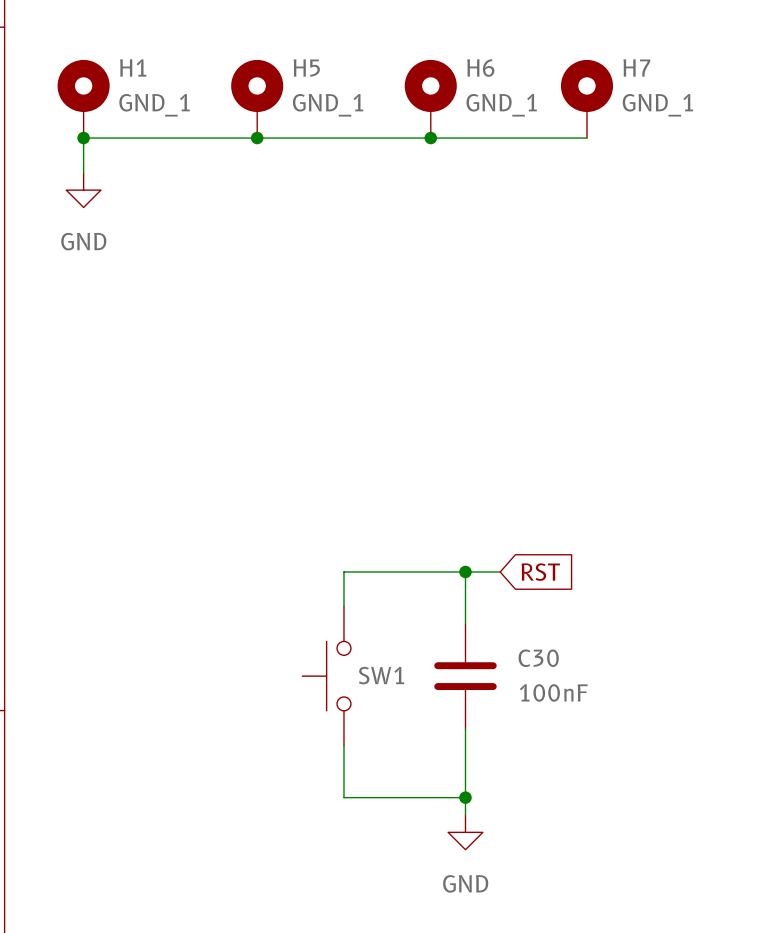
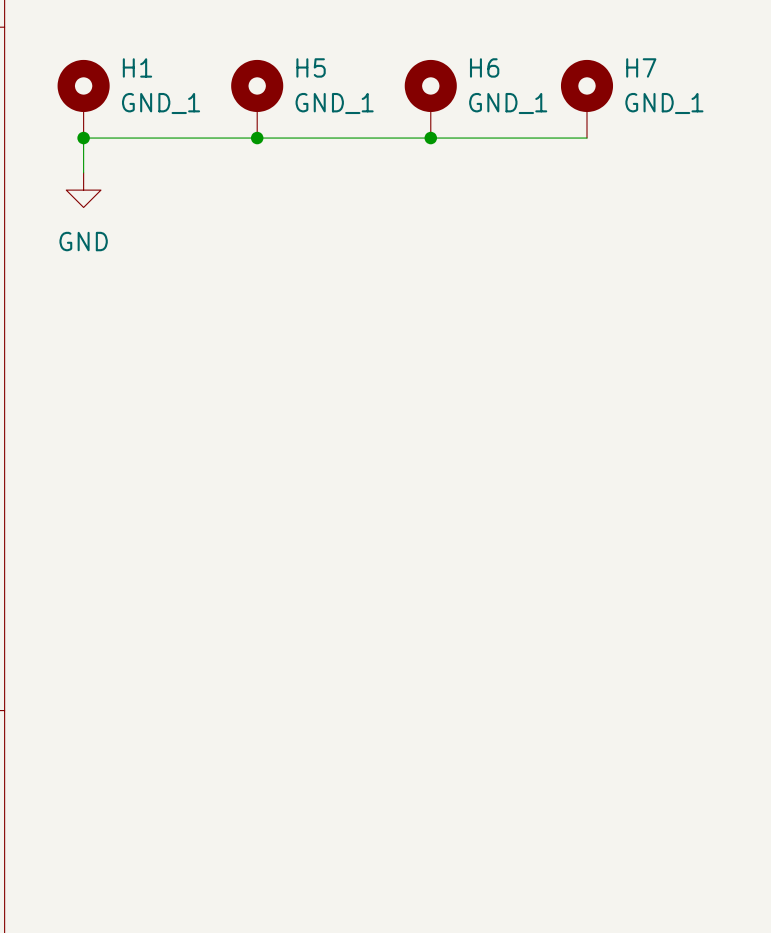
wire: (465, 571) (465, 624) -> none
junction: (465, 571) -> none
wire: (500, 571) (343, 571) (343, 606) -> none
global label: RST (540, 572) -> none
SW1: (326, 676) -> none
C30: 100nF (465, 676) -> none
wire: (465, 728) (465, 814) -> none
wire: (343, 745) (343, 797) (465, 797) -> none
junction: (465, 797) -> none
power symbol: GND (465, 832) -> none

